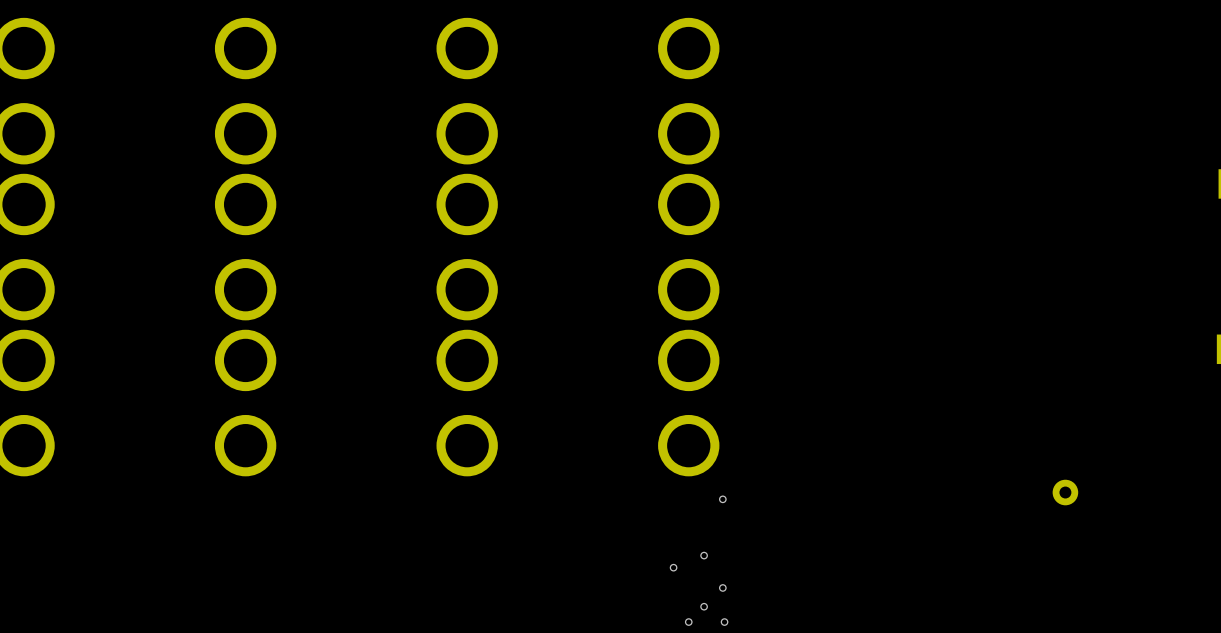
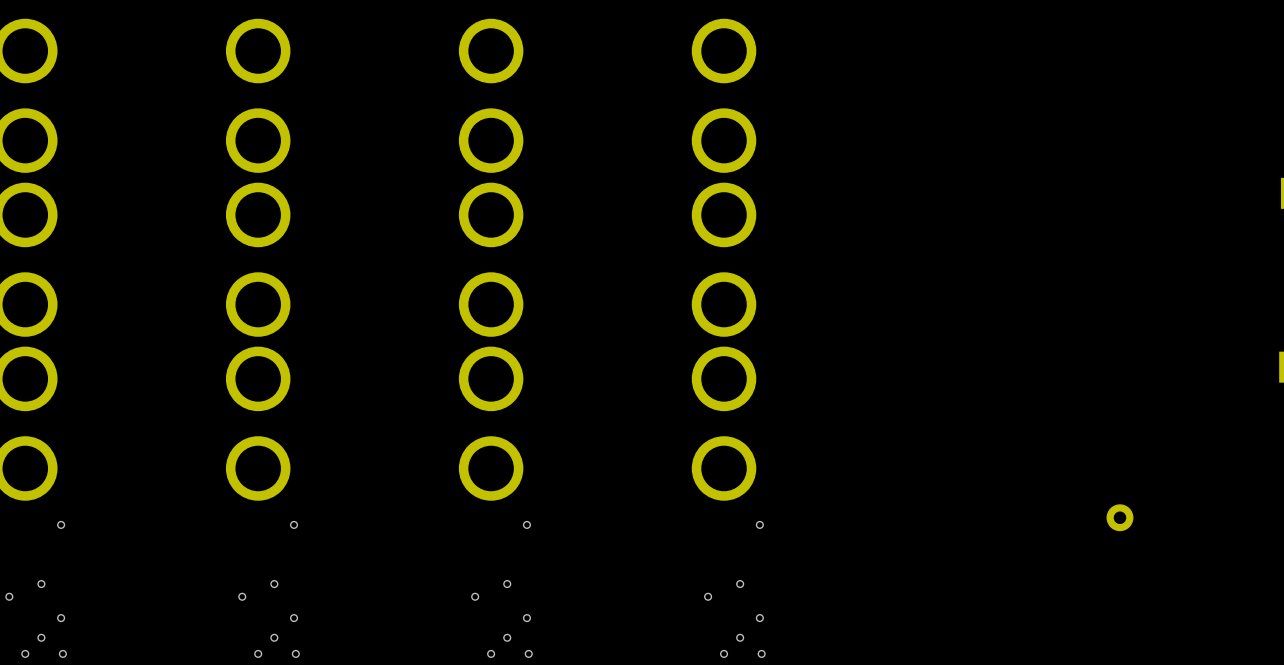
via: none -> (61, 524)
via: none -> (294, 524)
via: none -> (526, 524)
via: none -> (41, 584)
via: none -> (274, 584)
via: none -> (507, 584)
via: none -> (9, 596)
via: none -> (242, 596)
via: none -> (475, 596)
via: none -> (61, 618)
via: none -> (294, 618)
via: none -> (526, 618)
via: none -> (41, 637)
via: none -> (274, 637)
via: none -> (507, 637)
via: none -> (25, 653)
via: none -> (62, 653)
via: none -> (258, 653)
via: none -> (295, 653)
via: none -> (491, 653)
via: none -> (528, 653)

